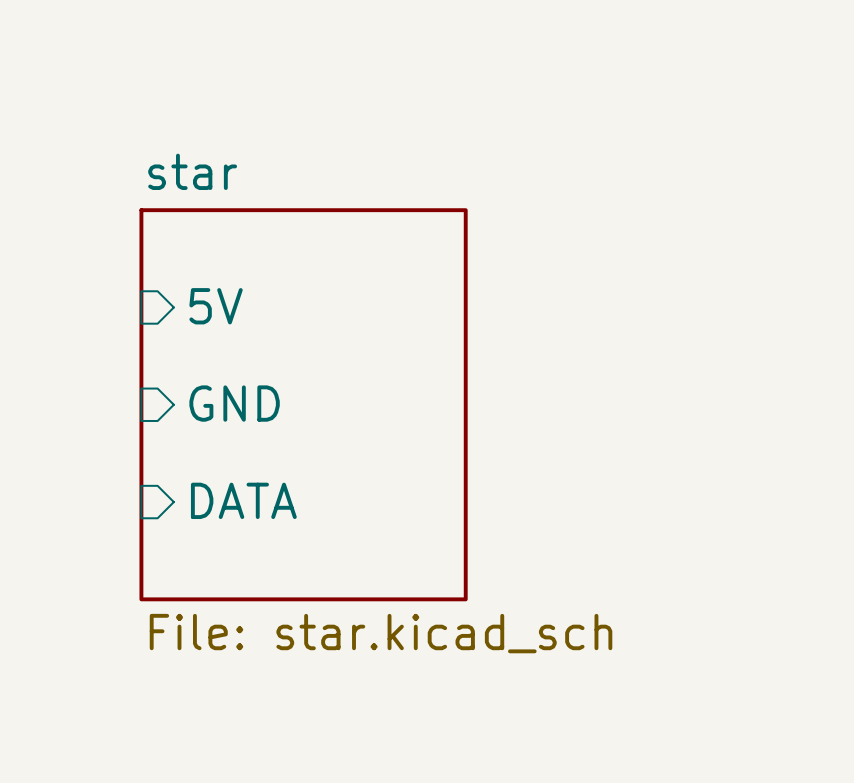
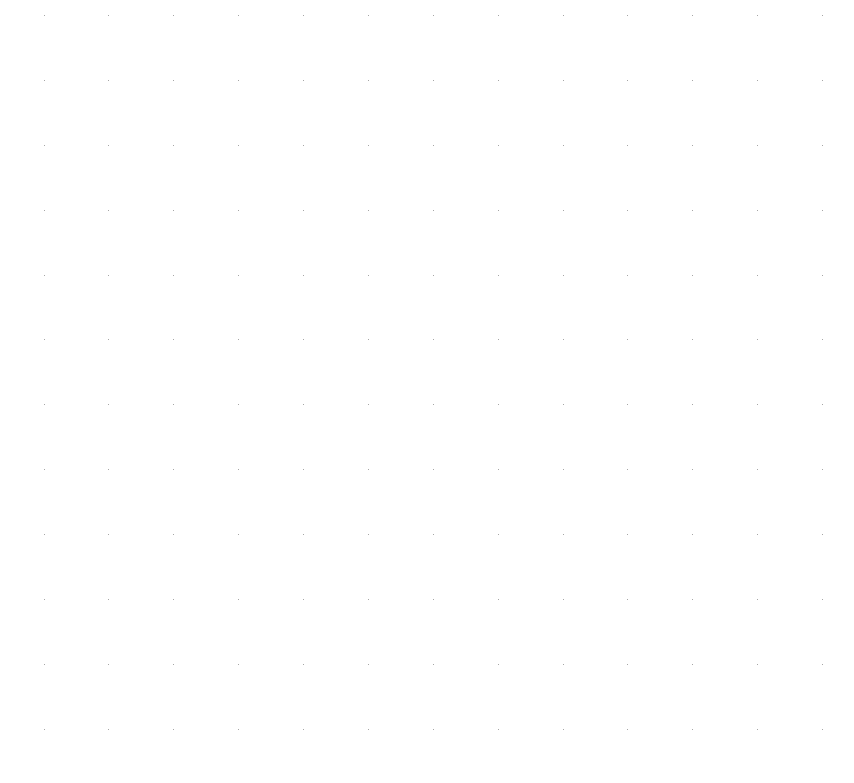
sheet pin: 5V (216, 306) -> none
sheet pin: GND (234, 403) -> none
sheet star: File: star.kicad_sch (303, 404) -> none
sheet pin: DATA (243, 500) -> none

